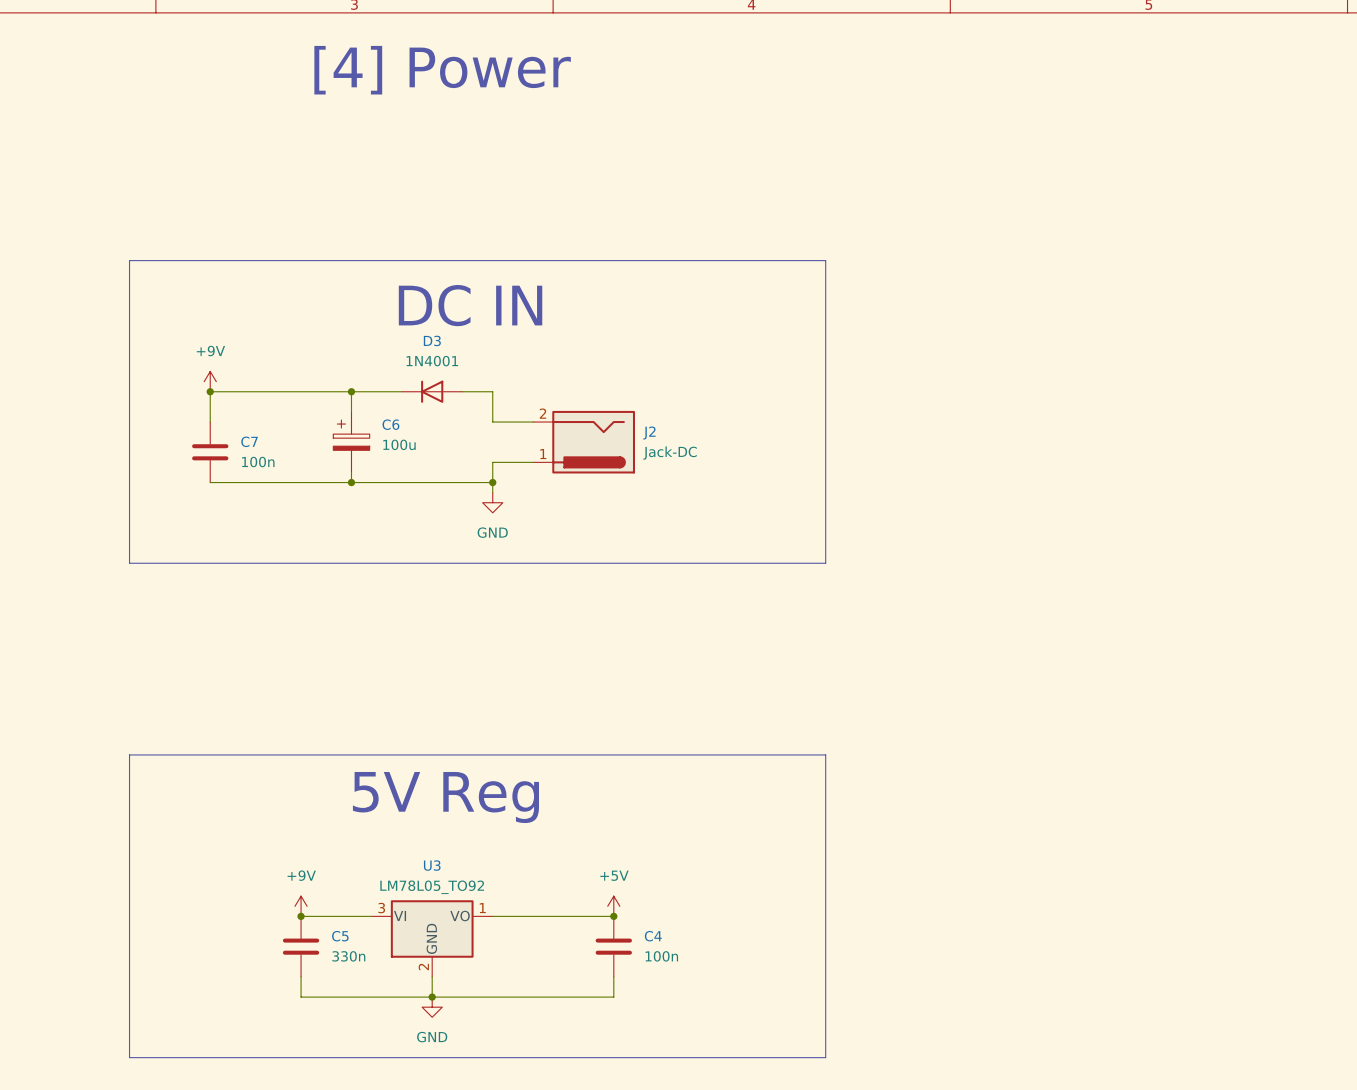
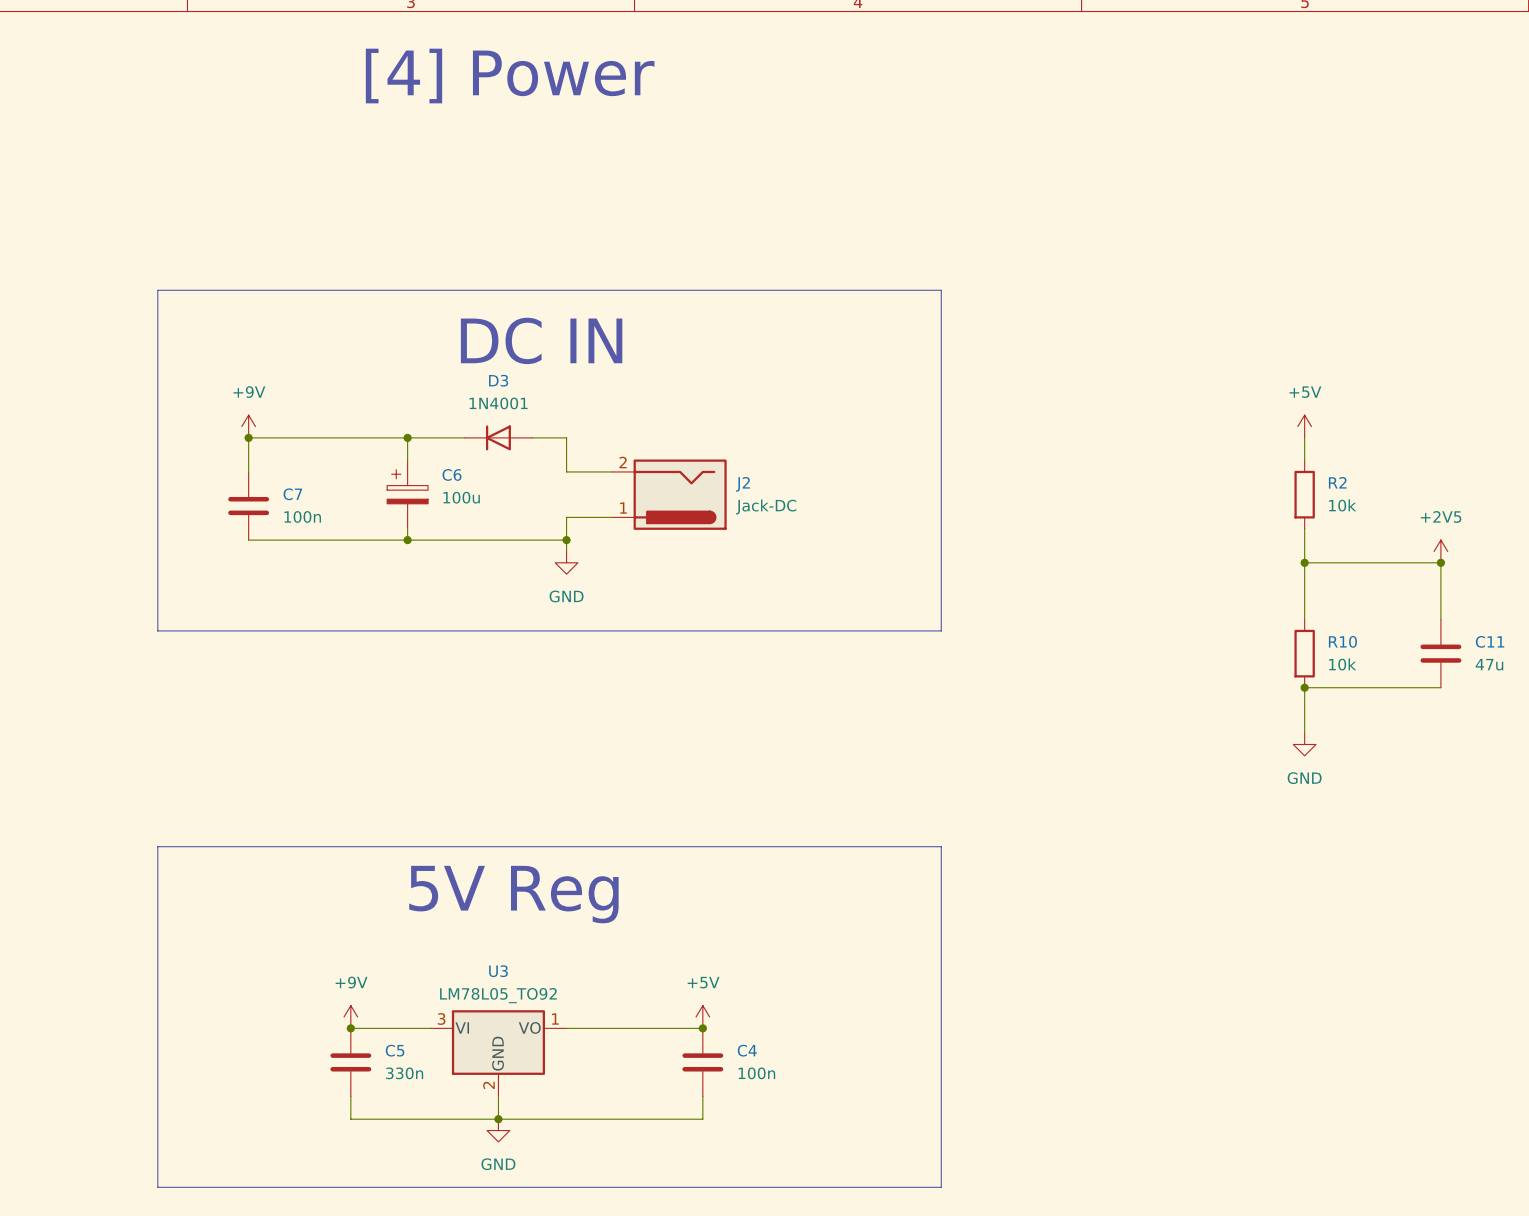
power symbol: none -> +5V (1304, 426)
wire: none -> (1304, 437) (1304, 460)
R2: none -> 10k (1304, 494)
wire: none -> (1304, 528) (1304, 619)
power symbol: none -> +2V5 (1440, 551)
wire: none -> (1304, 562) (1440, 562) (1440, 619)
junction: none -> (1304, 562)
junction: none -> (1440, 562)
R10: none -> 10k (1304, 653)
C11: none -> 47u (1440, 653)
junction: none -> (1304, 687)
wire: none -> (1440, 687) (1304, 687) (1304, 733)
power symbol: none -> GND (1304, 744)

